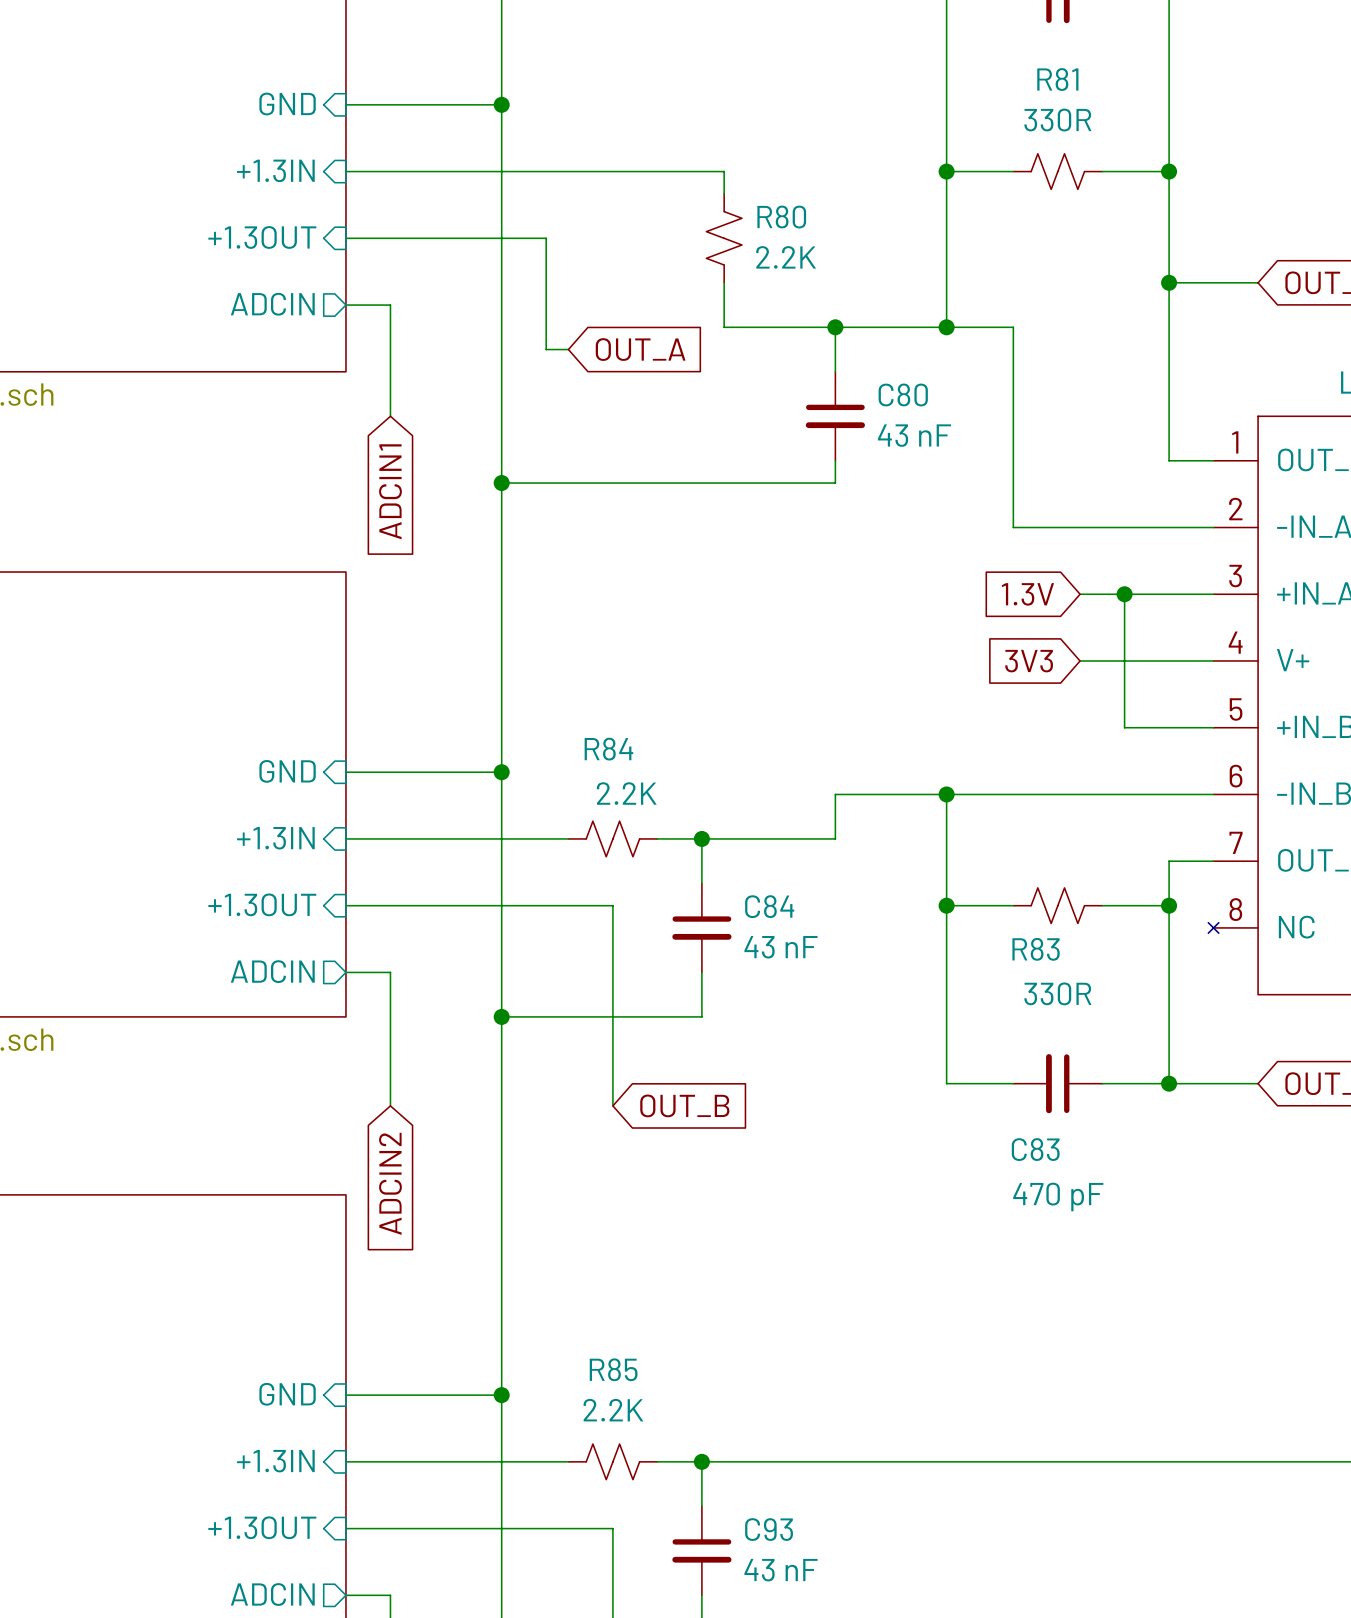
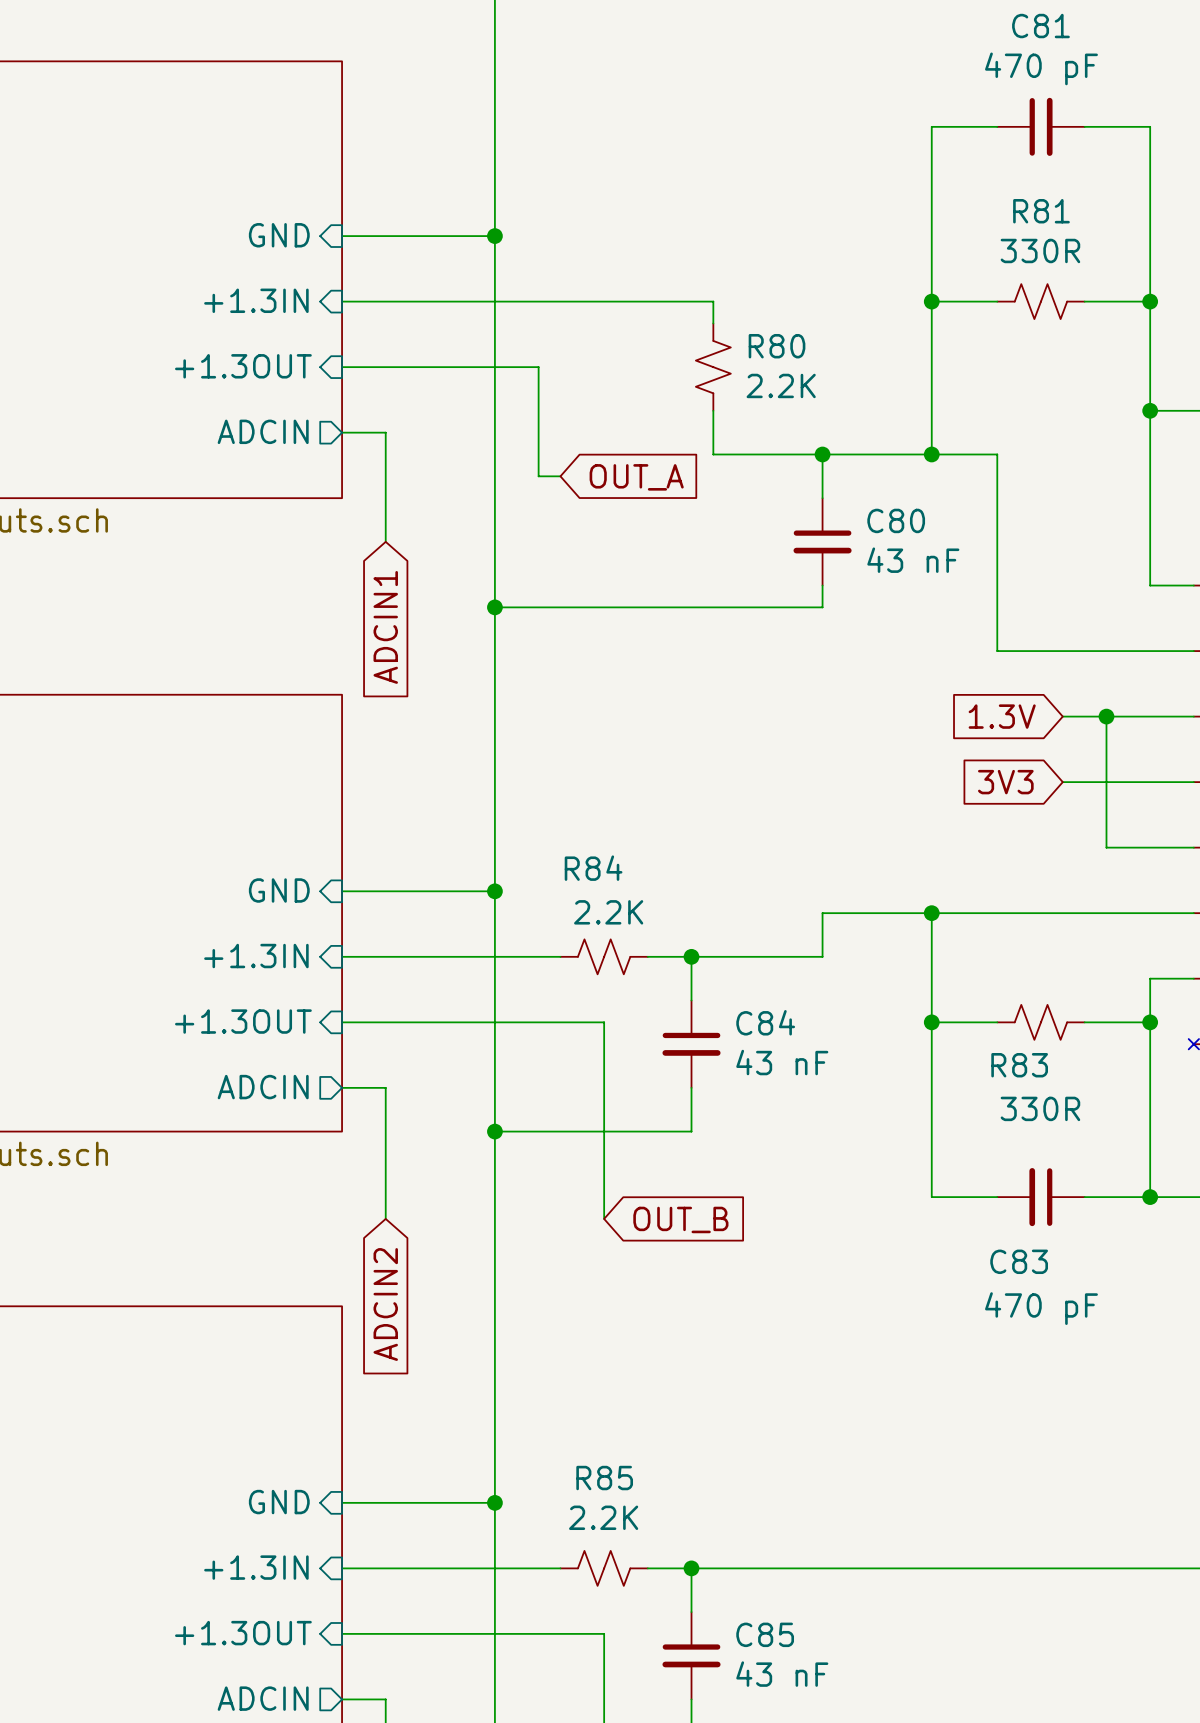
C93 name: C93 (769, 1529) -> C85 (765, 1634)

